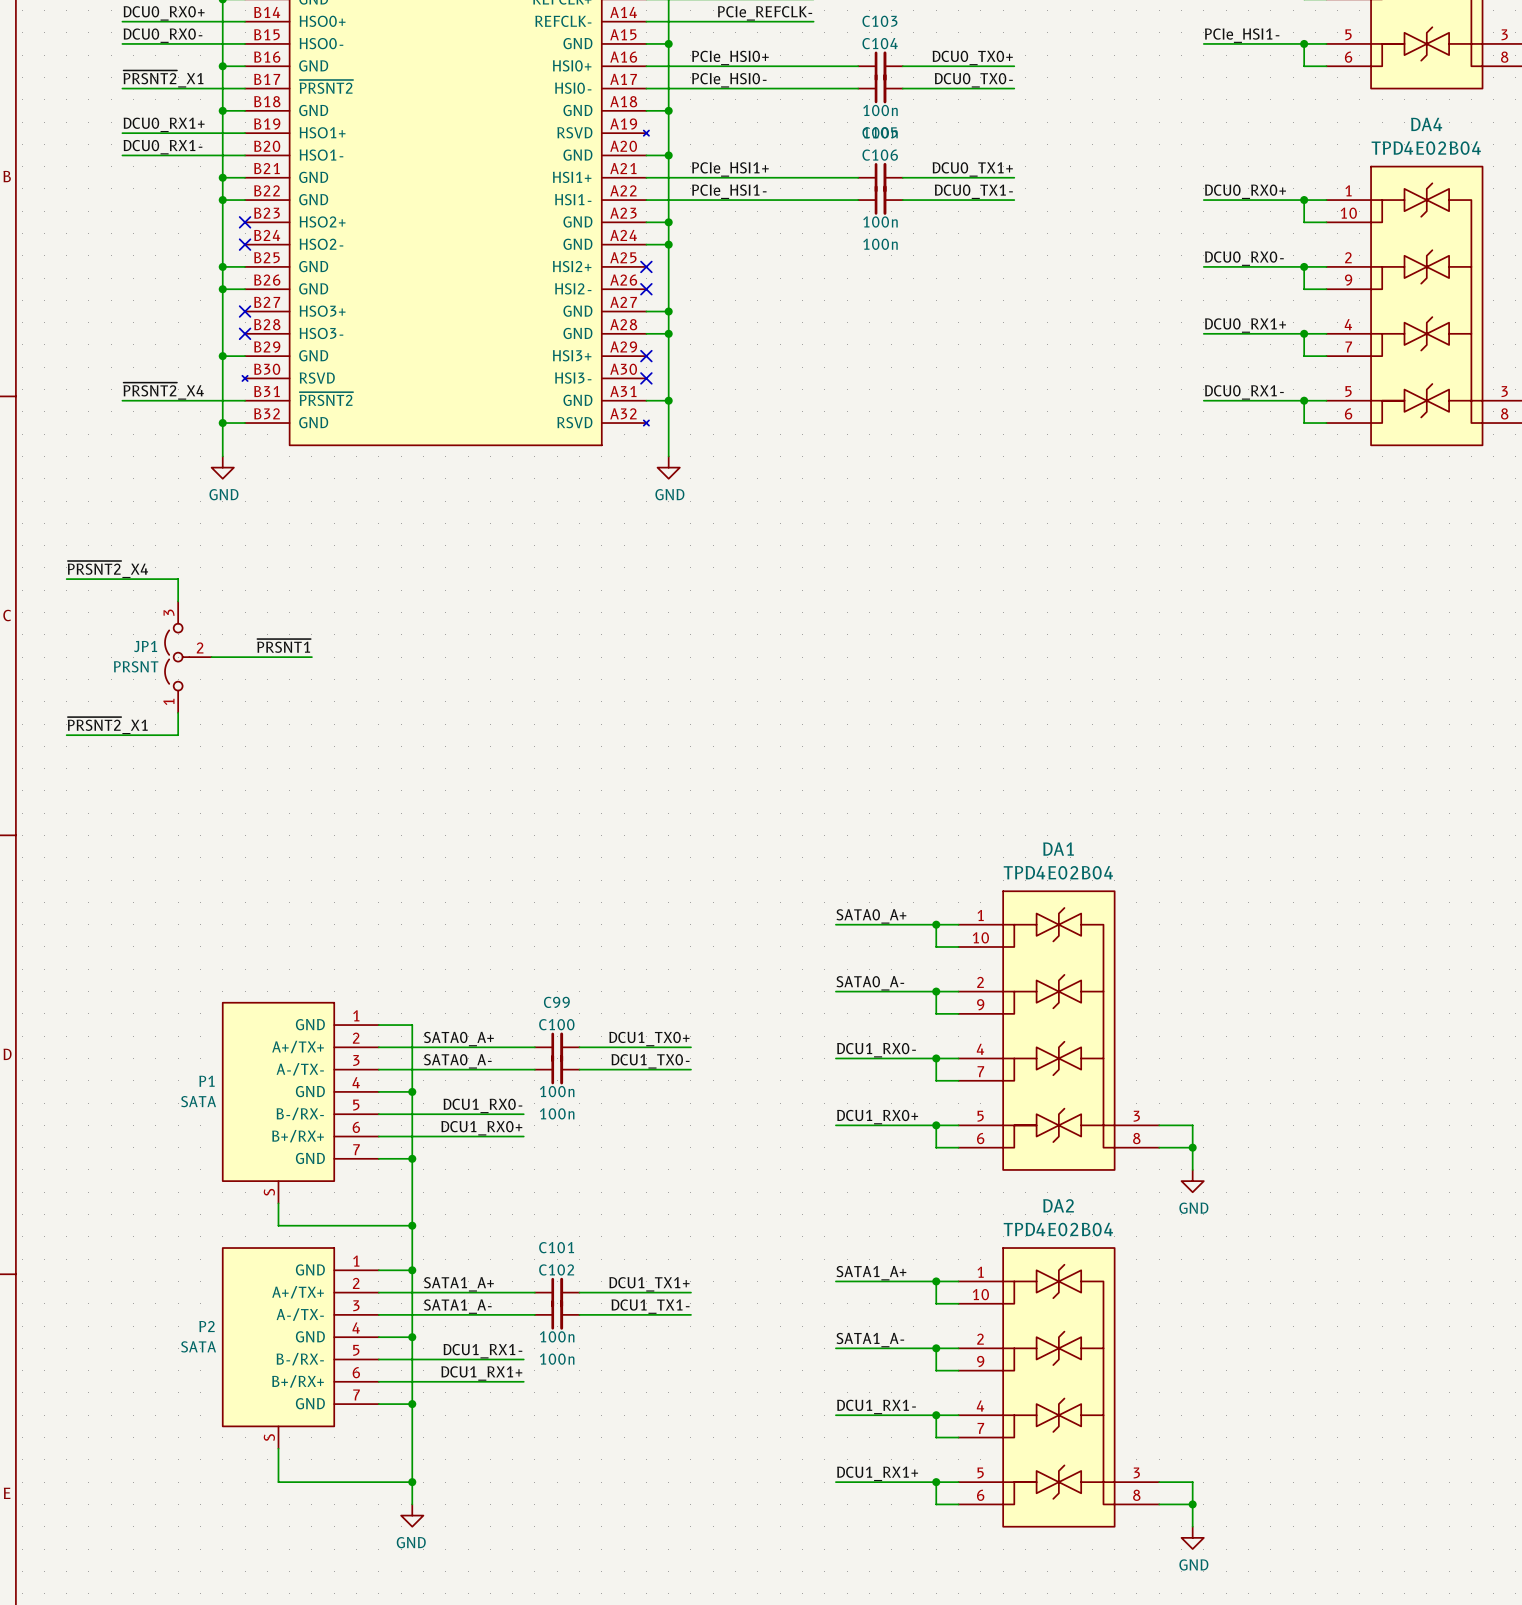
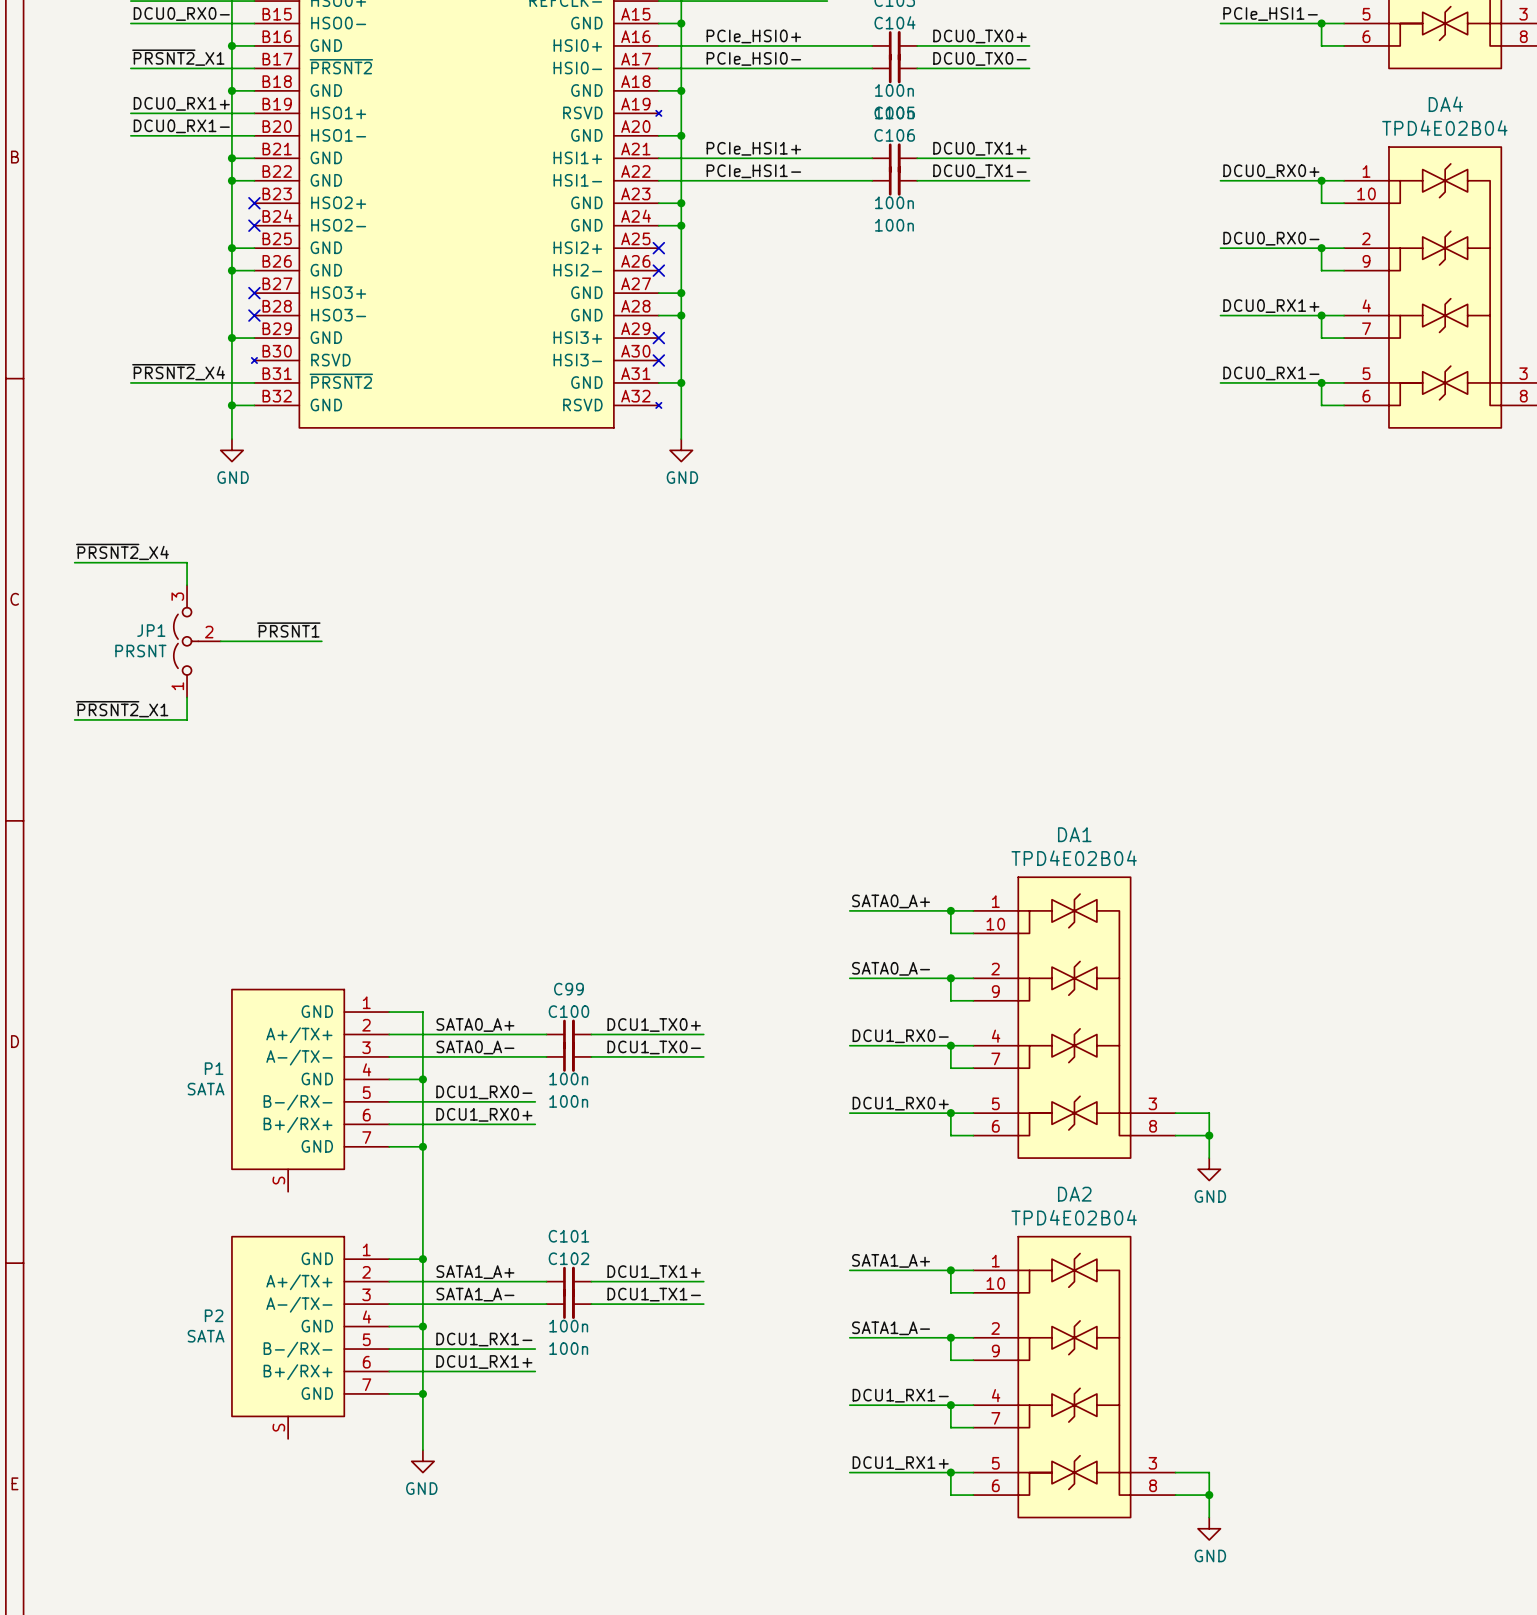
wire: (278, 1203) (278, 1225) (412, 1225) -> none
junction: (412, 1225) -> none
wire: (278, 1448) (278, 1482) (412, 1482) -> none
wire: (412, 1459) (412, 1504) -> none
junction: (412, 1482) -> none
power symbol position: GND (412, 1515) -> GND (422, 1461)

